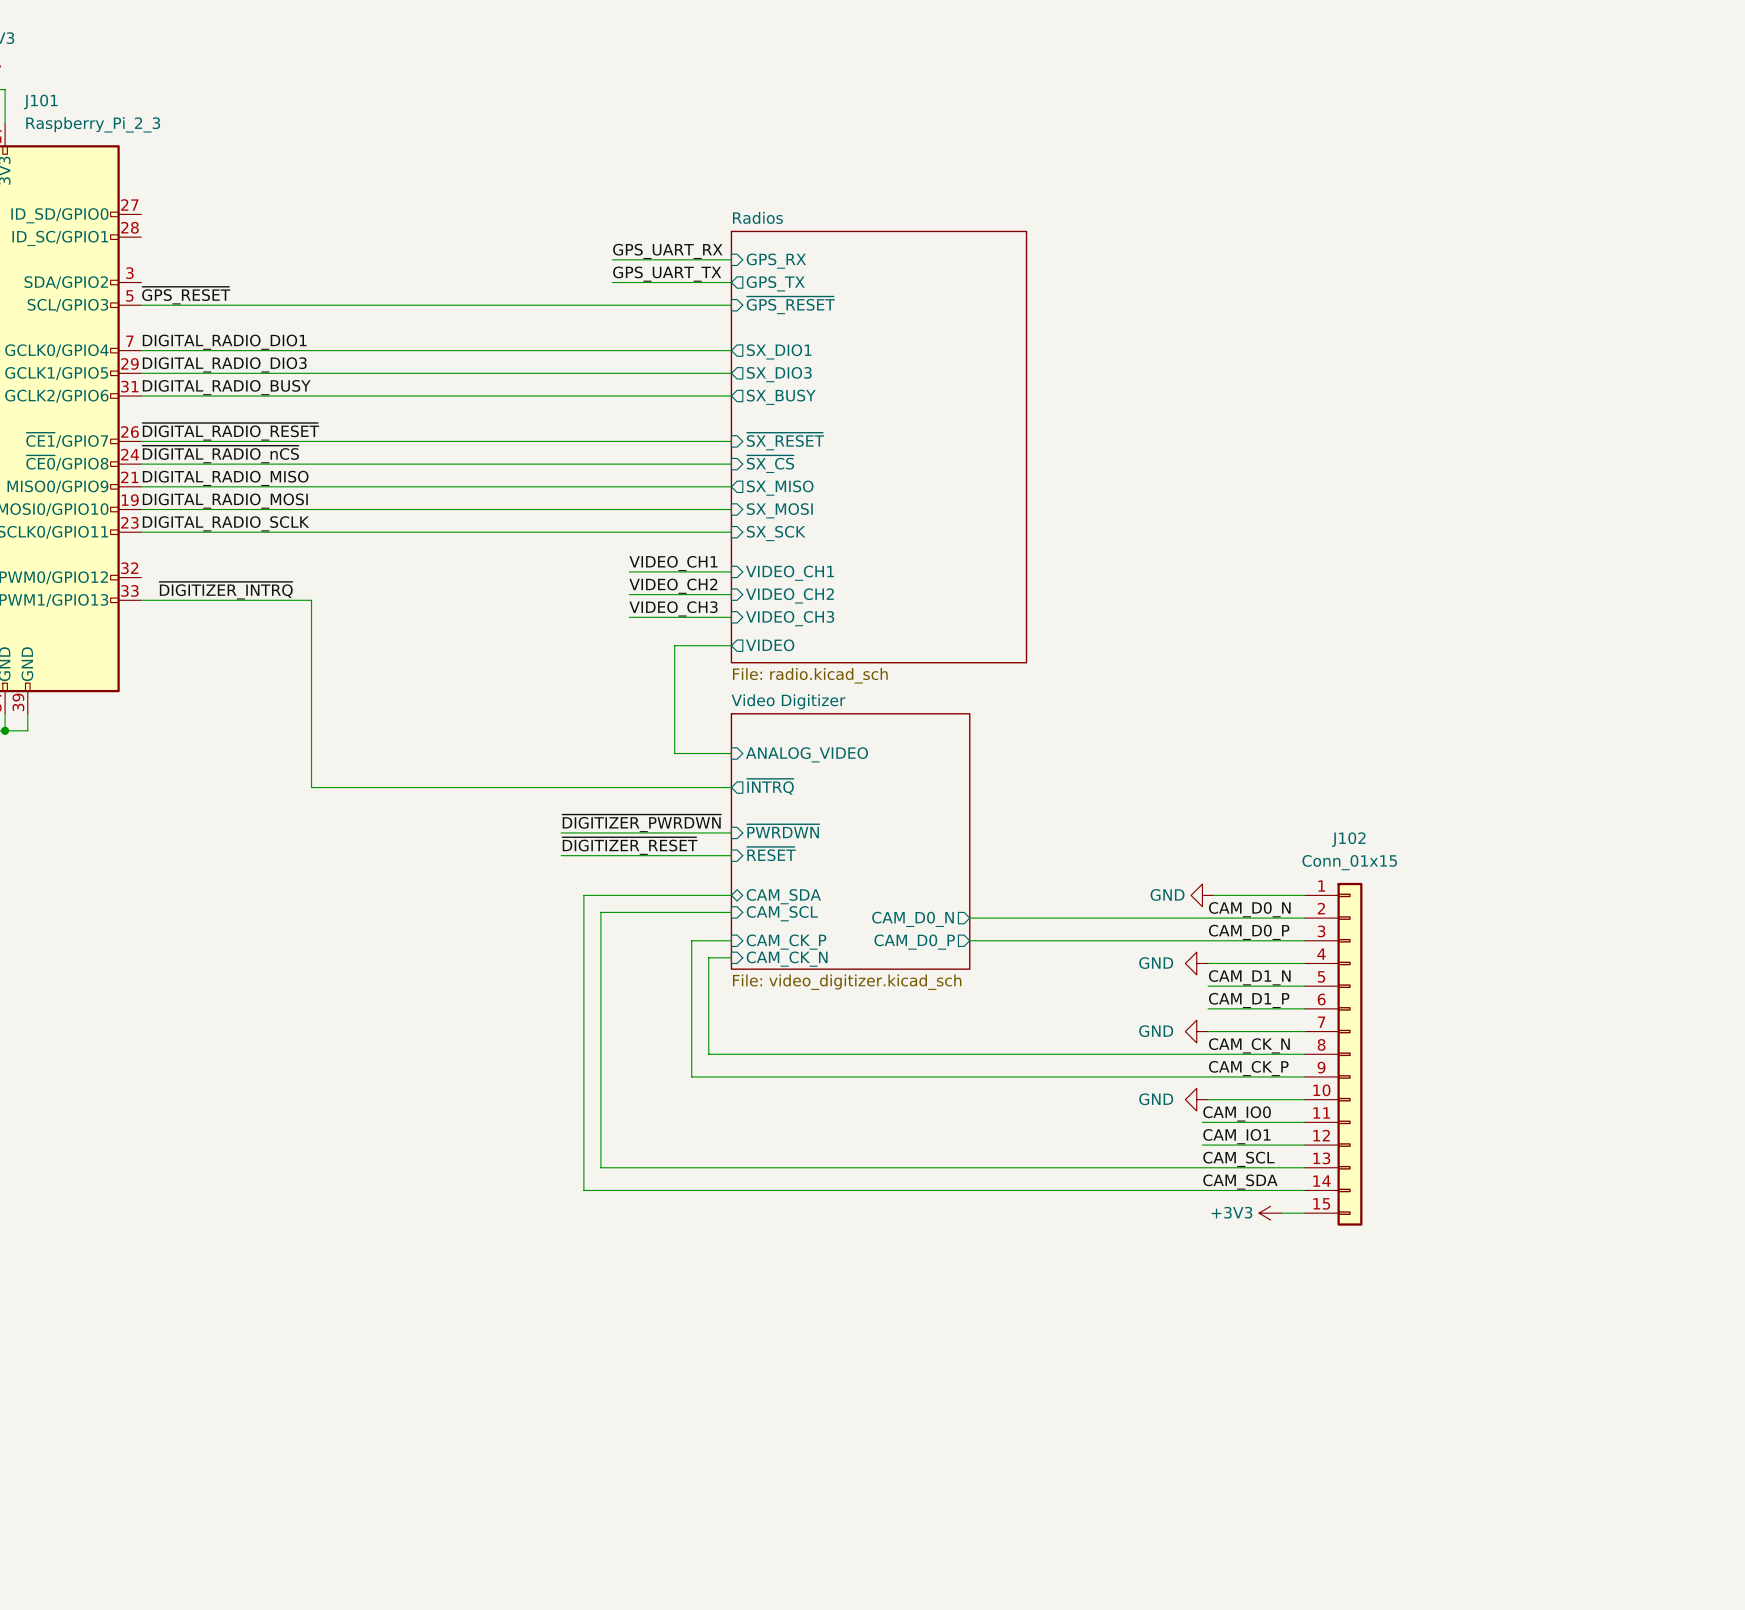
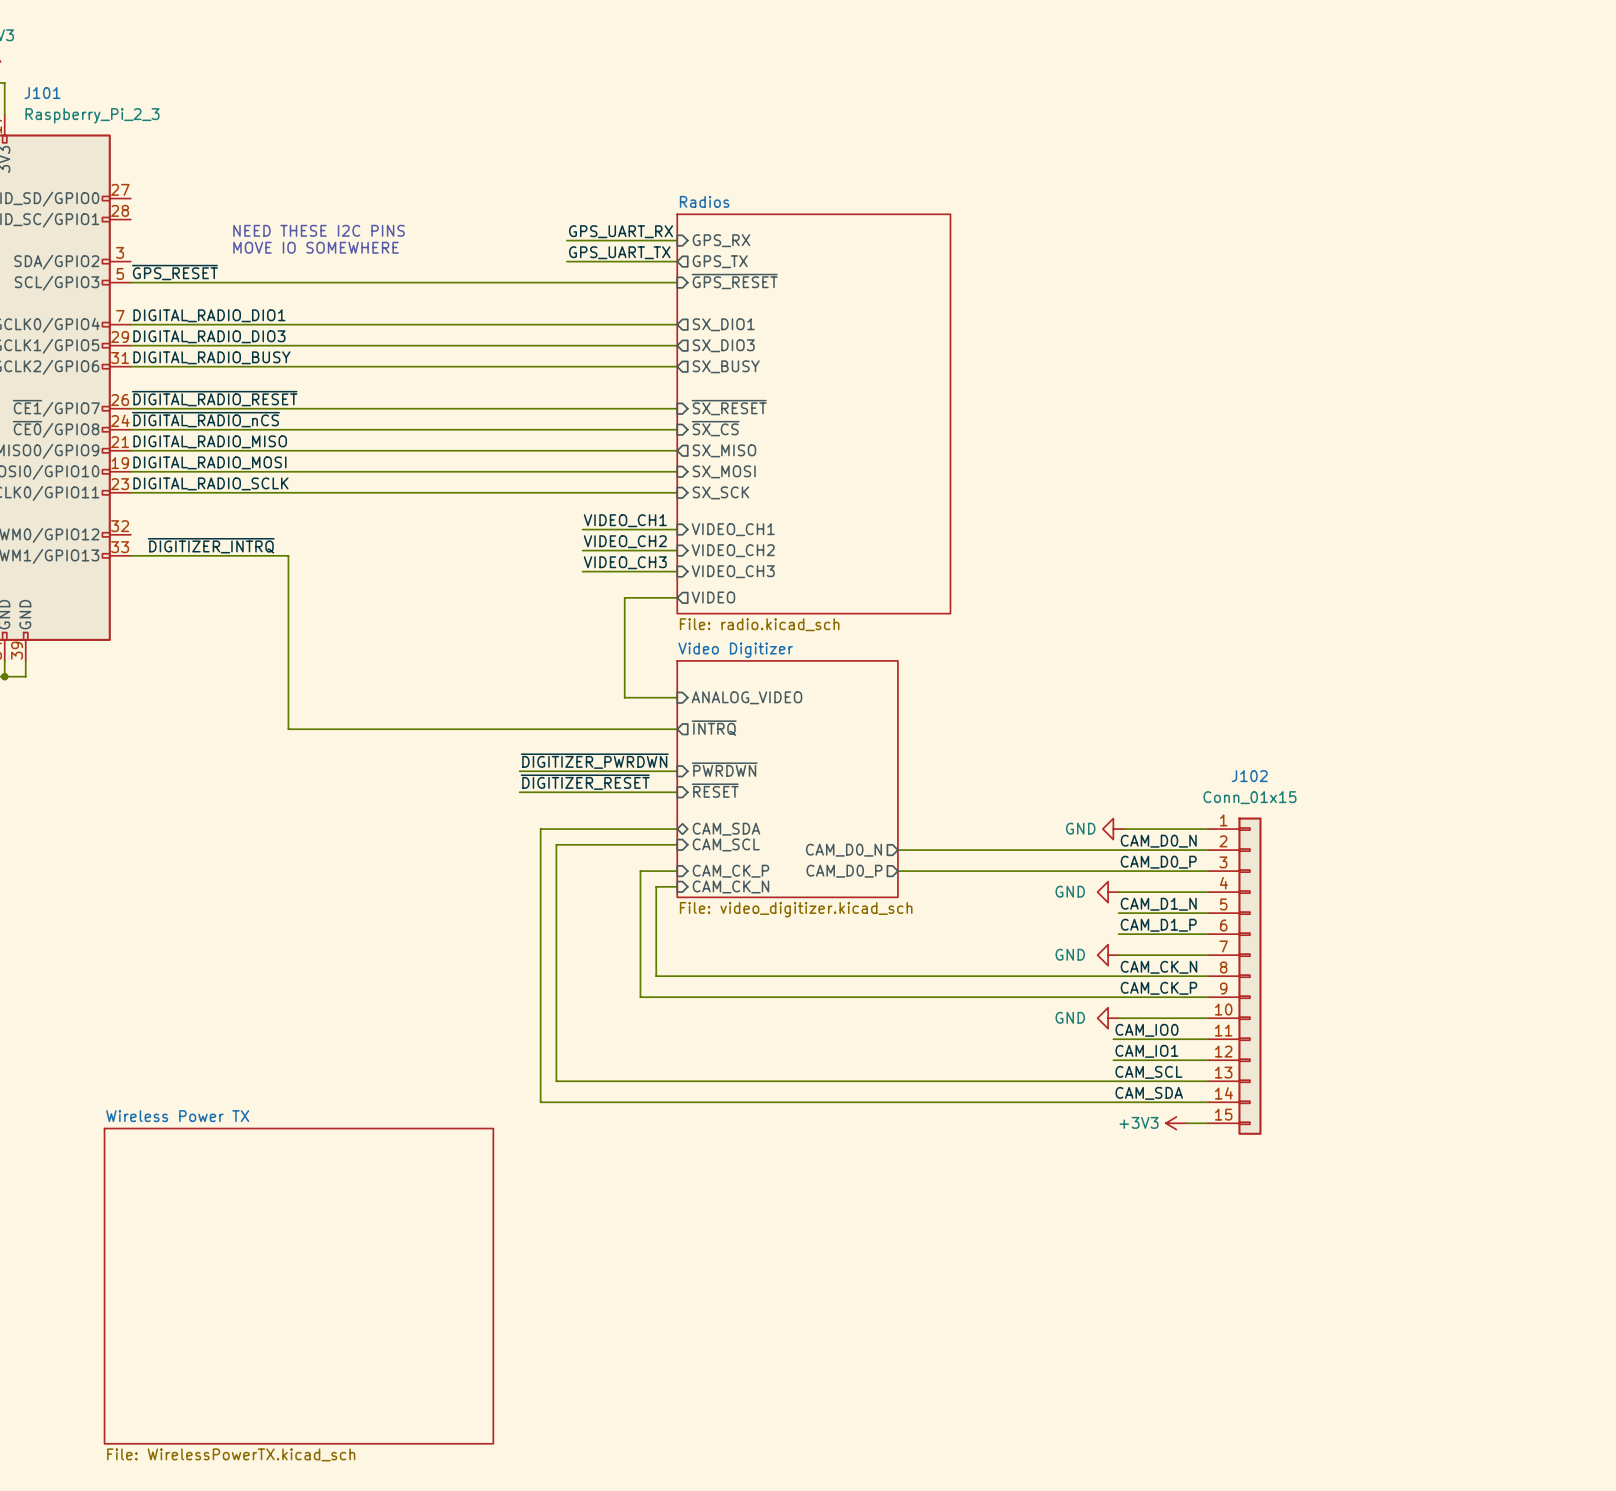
text: none -> NEED THESE I2C PINS (319, 230)
text: none -> MOVE IO SOMEWHERE (316, 247)
sheet Wireless Power TX: none -> File: WirelessPowerTX.kicad_sch (298, 1286)

